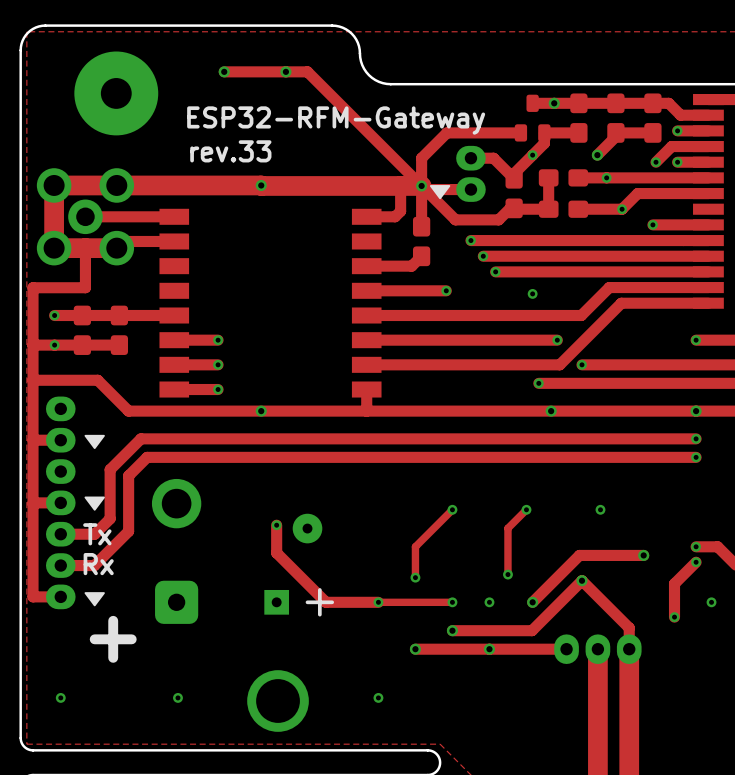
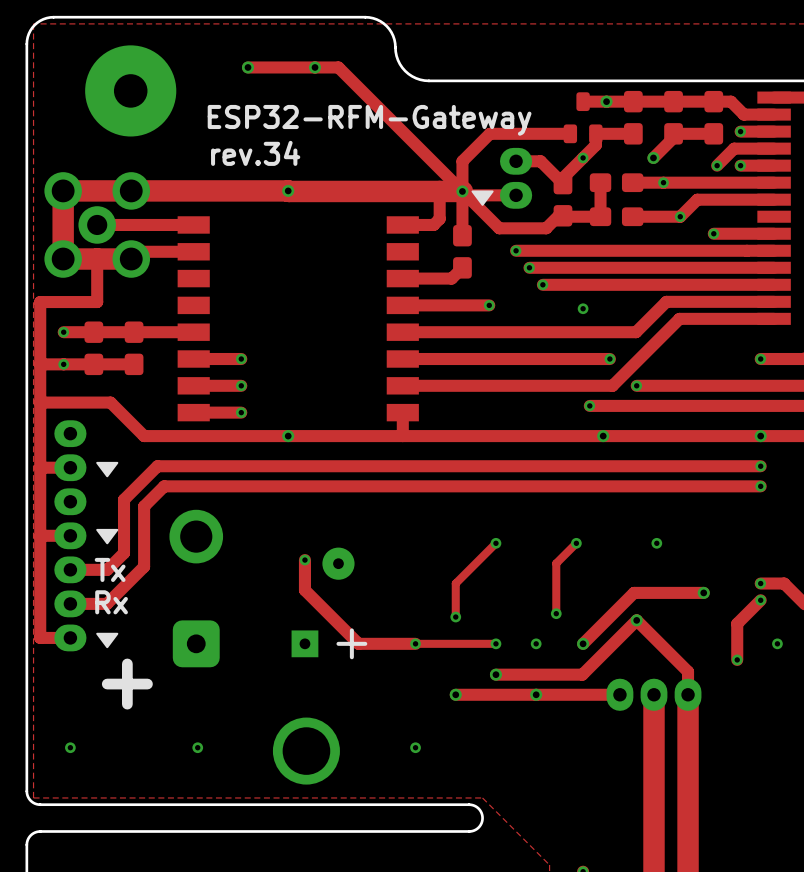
text: rev.33 (230, 151) -> rev.34 (255, 153)

